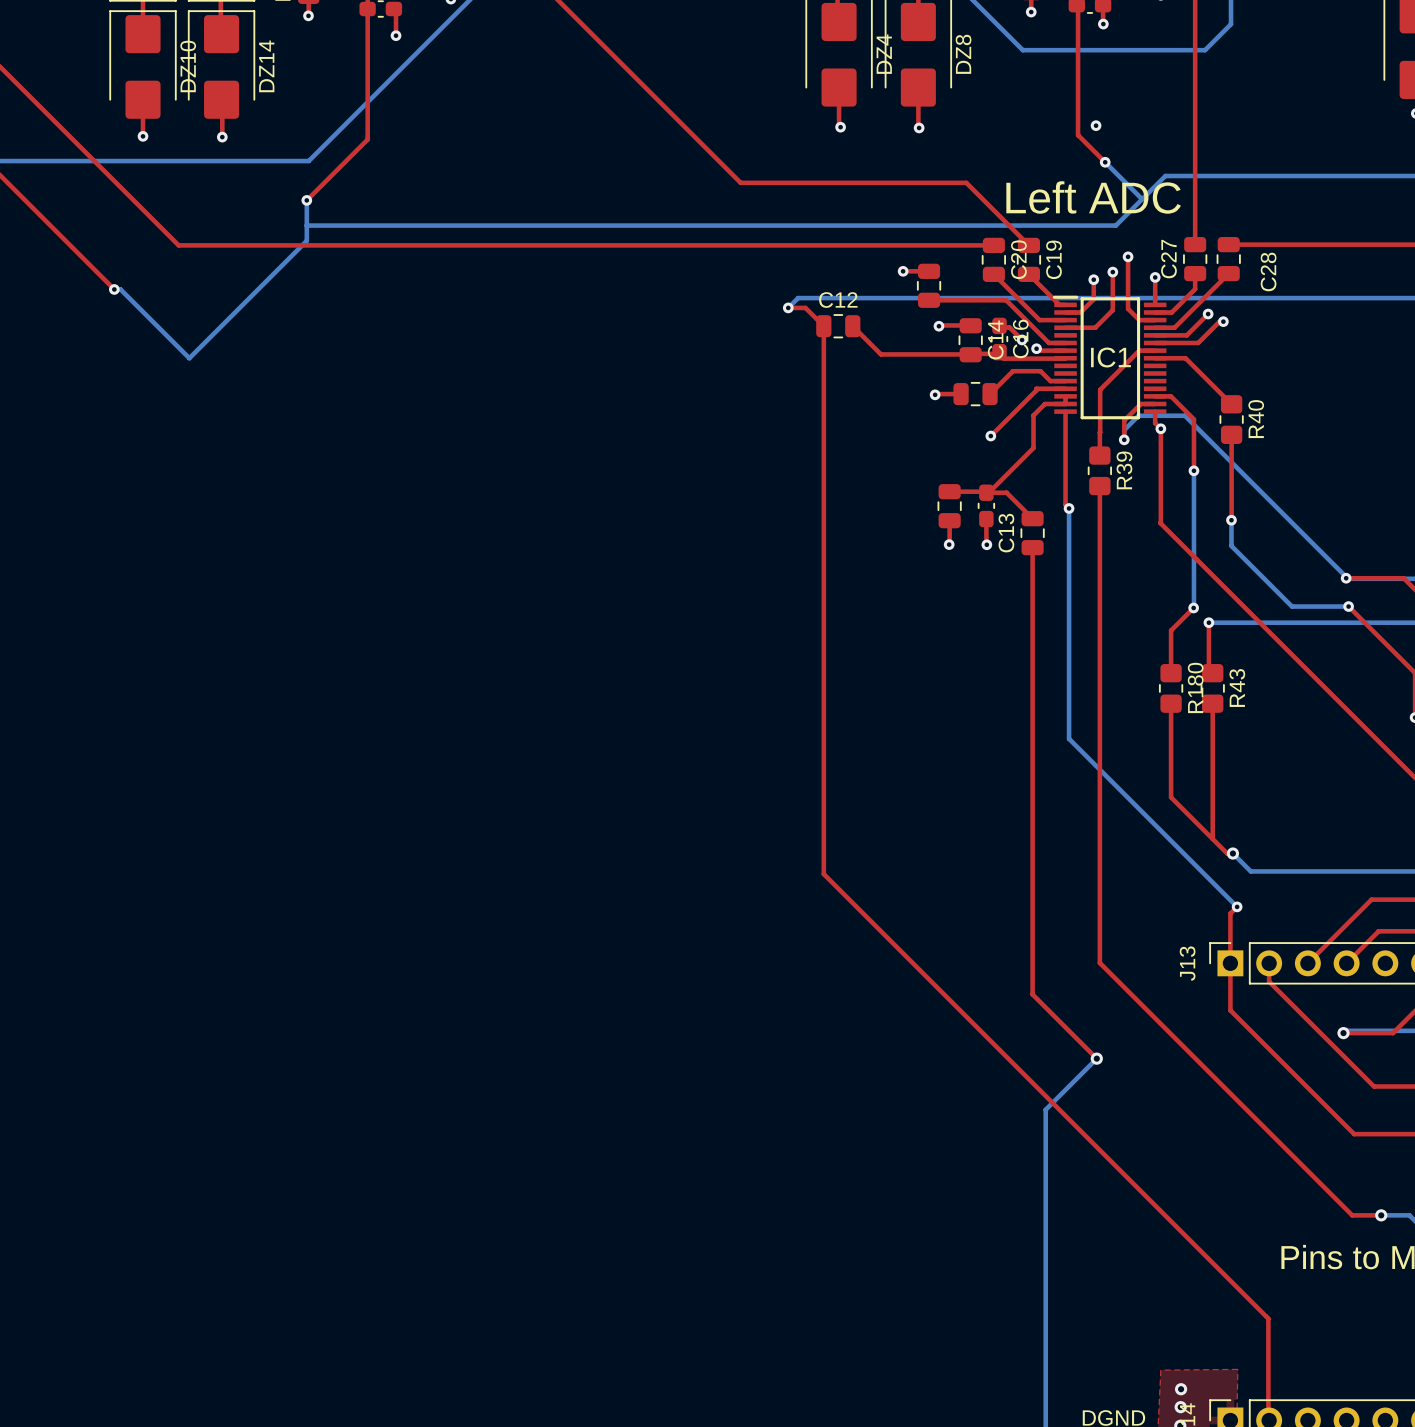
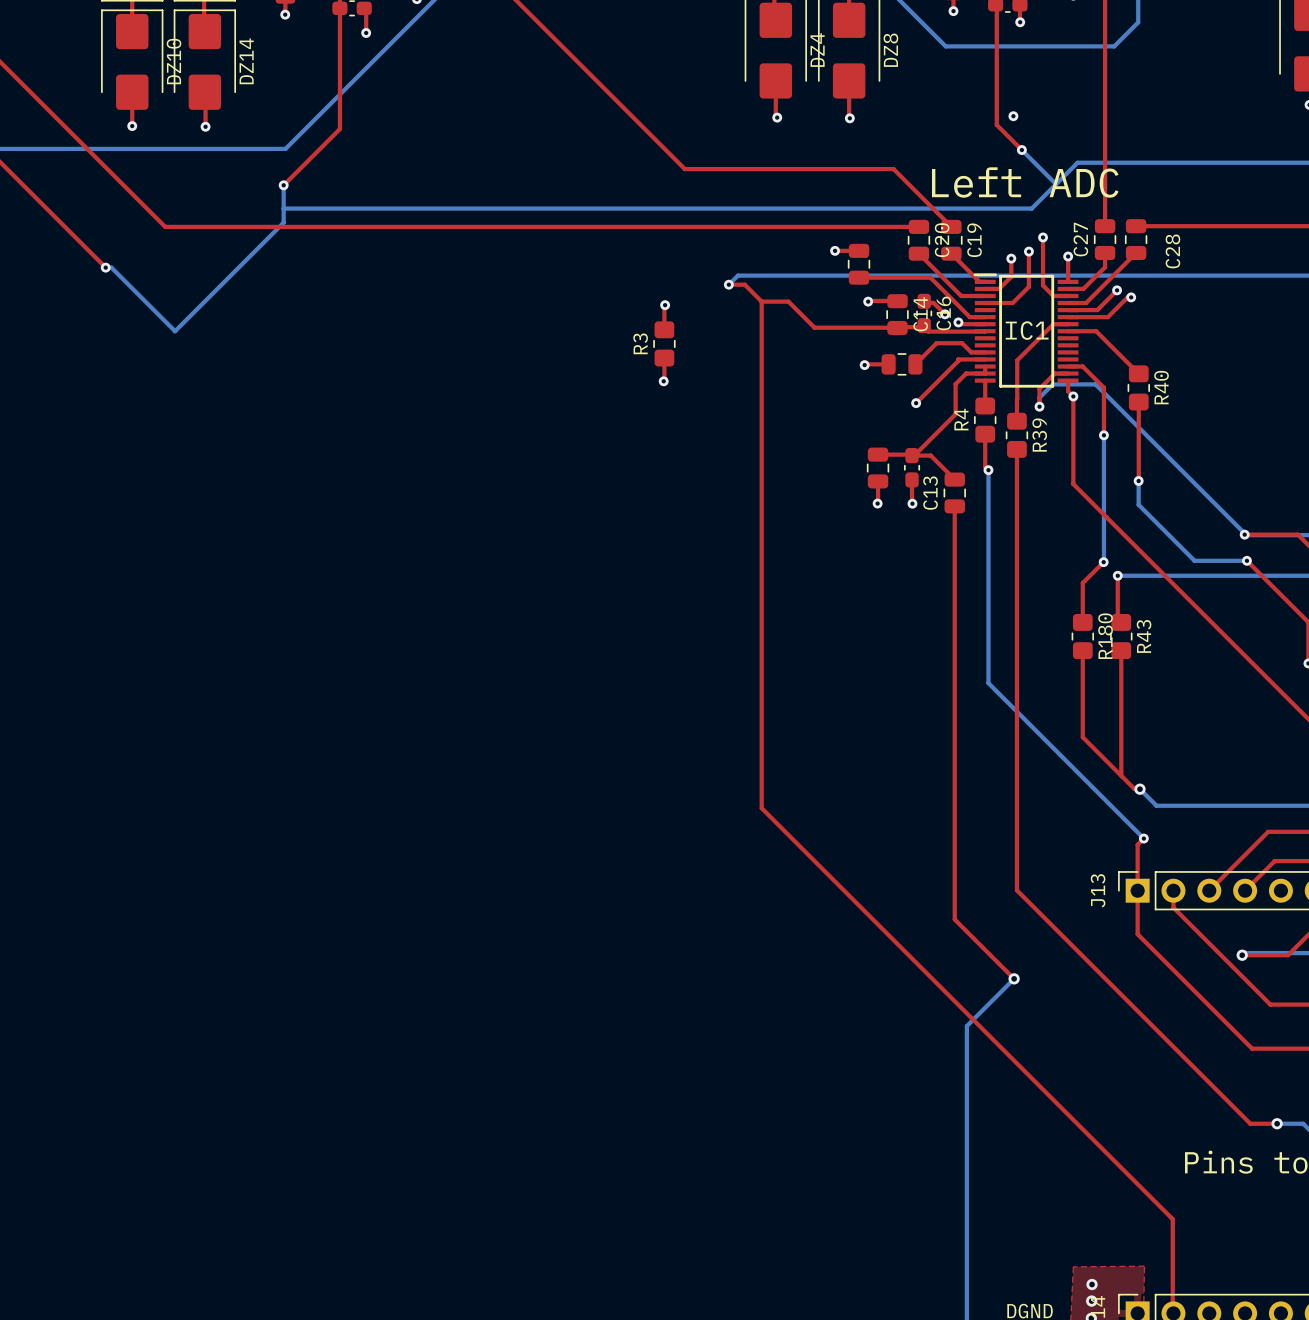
top track: none -> (761, 301) (788, 301)
C12: (838, 326) -> none
top track: none -> (665, 305) (664, 329)
via: none -> (665, 305)
R3: none -> (664, 343)
top track: none -> (664, 358) (663, 381)
via: none -> (663, 381)
top track: (1065, 439) (1065, 469) -> none
R4: none -> (985, 420)

